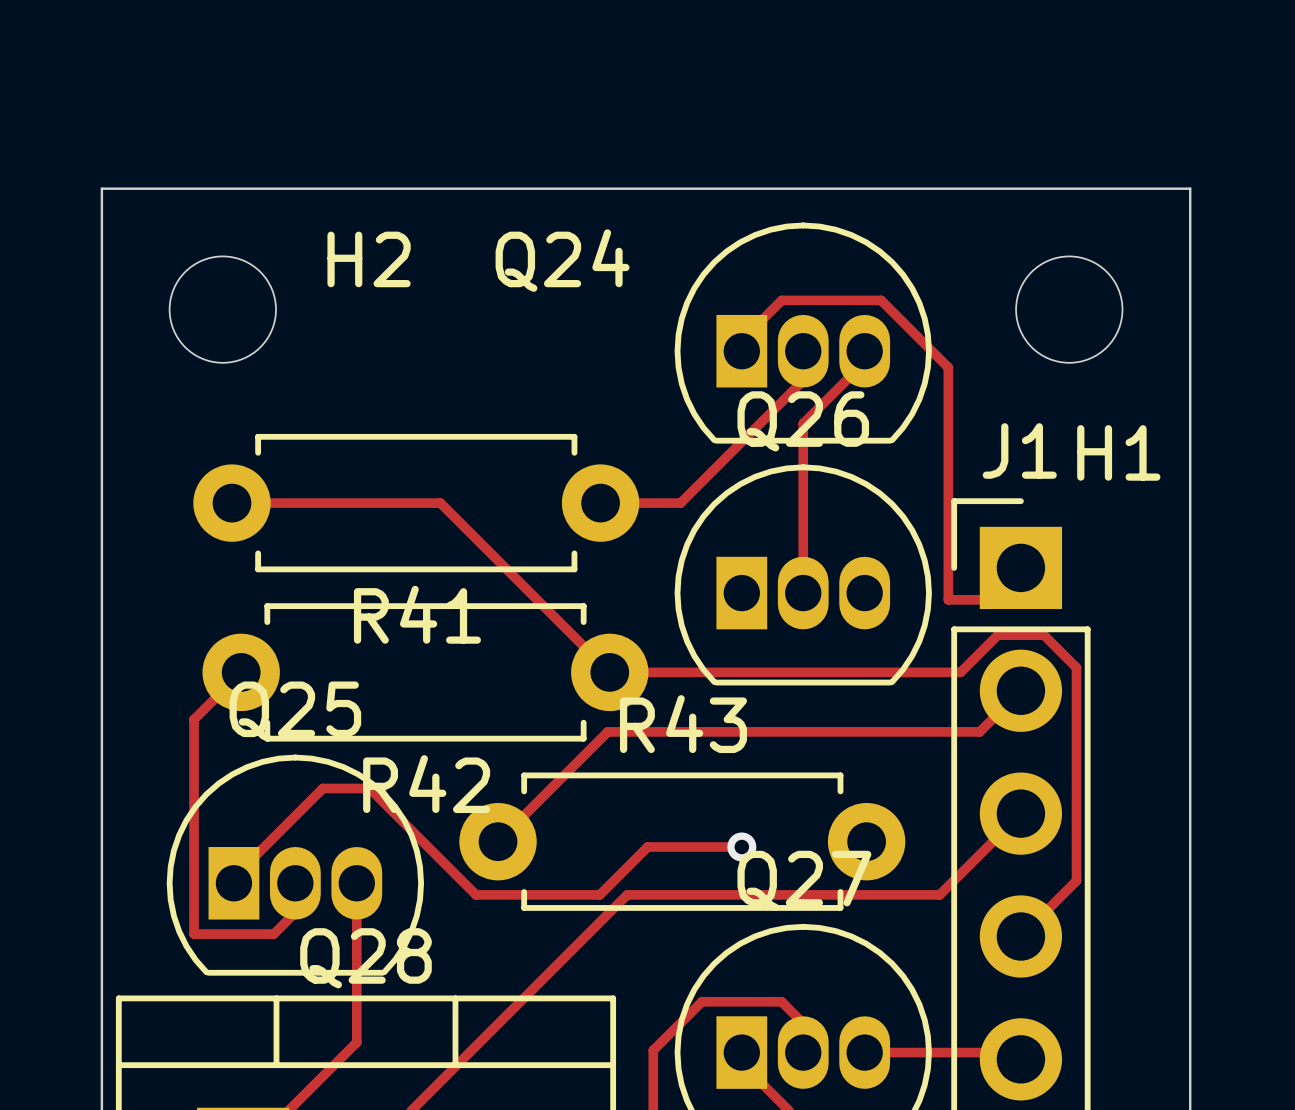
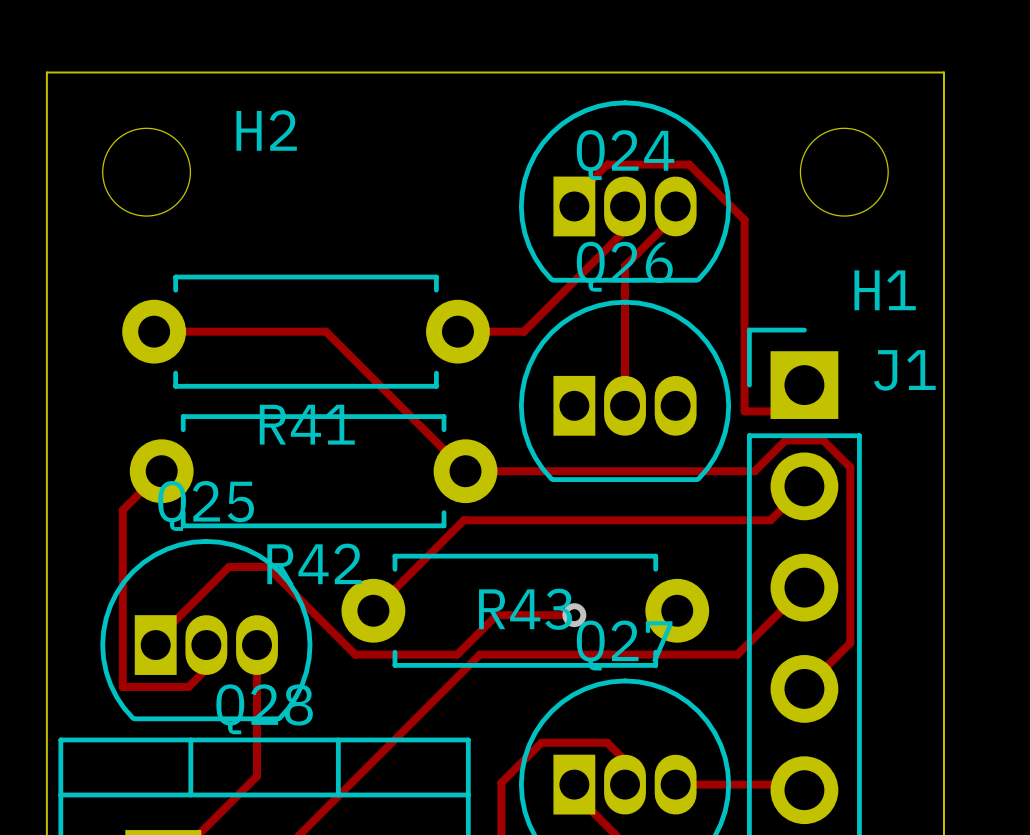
Q24 name position: Q24 (562, 260) -> Q24 (625, 155)
J1 name position: J1 (1019, 450) -> J1 (904, 370)
R43 name position: R43 (683, 724) -> R43 (525, 609)

